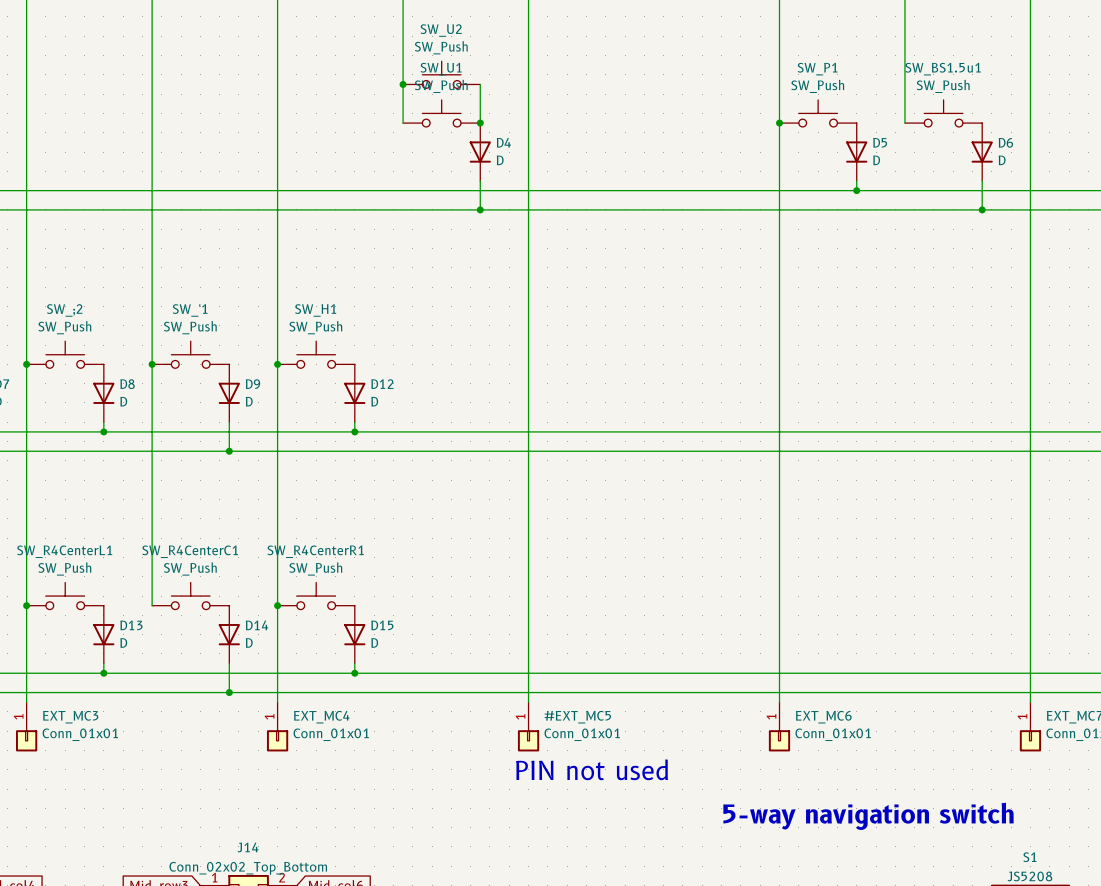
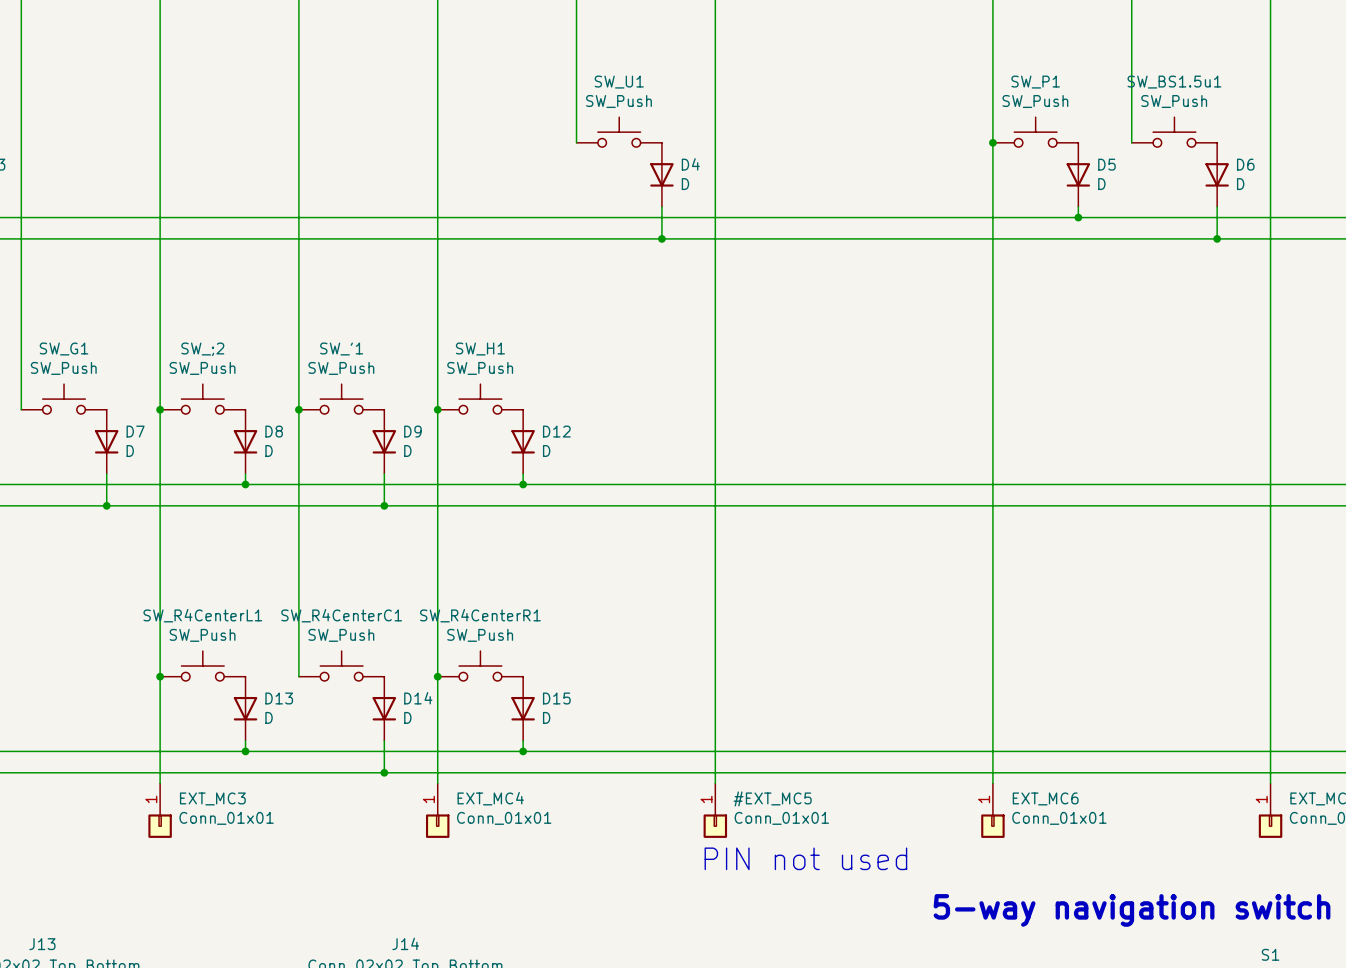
SW_U2: SW_Push (441, 74) -> none
junction: (403, 84) -> none
wire: (480, 84) (480, 123) -> none
junction: (480, 123) -> none

